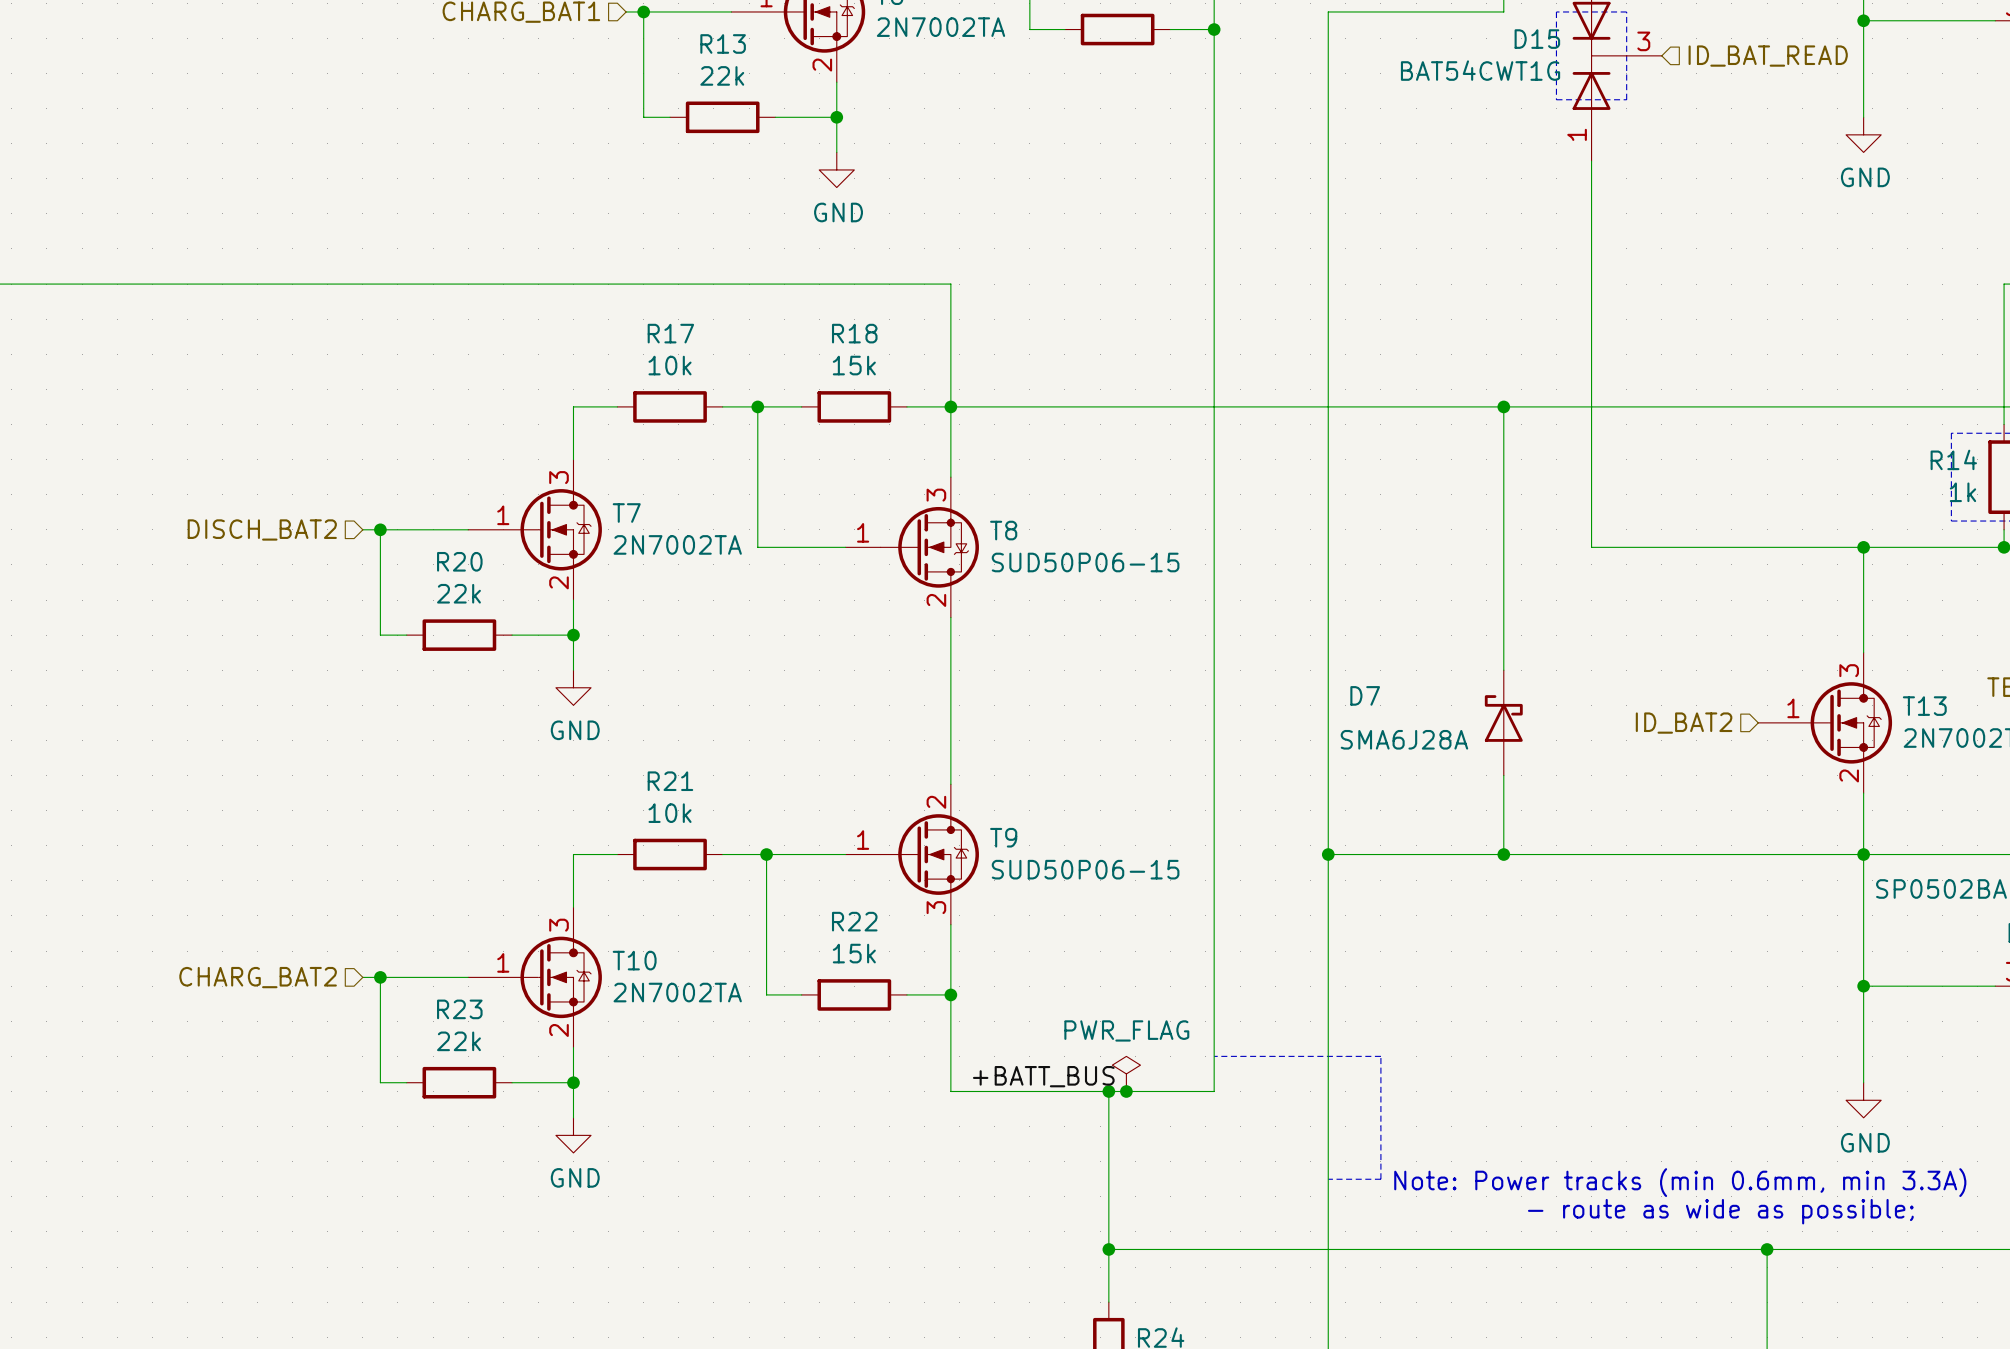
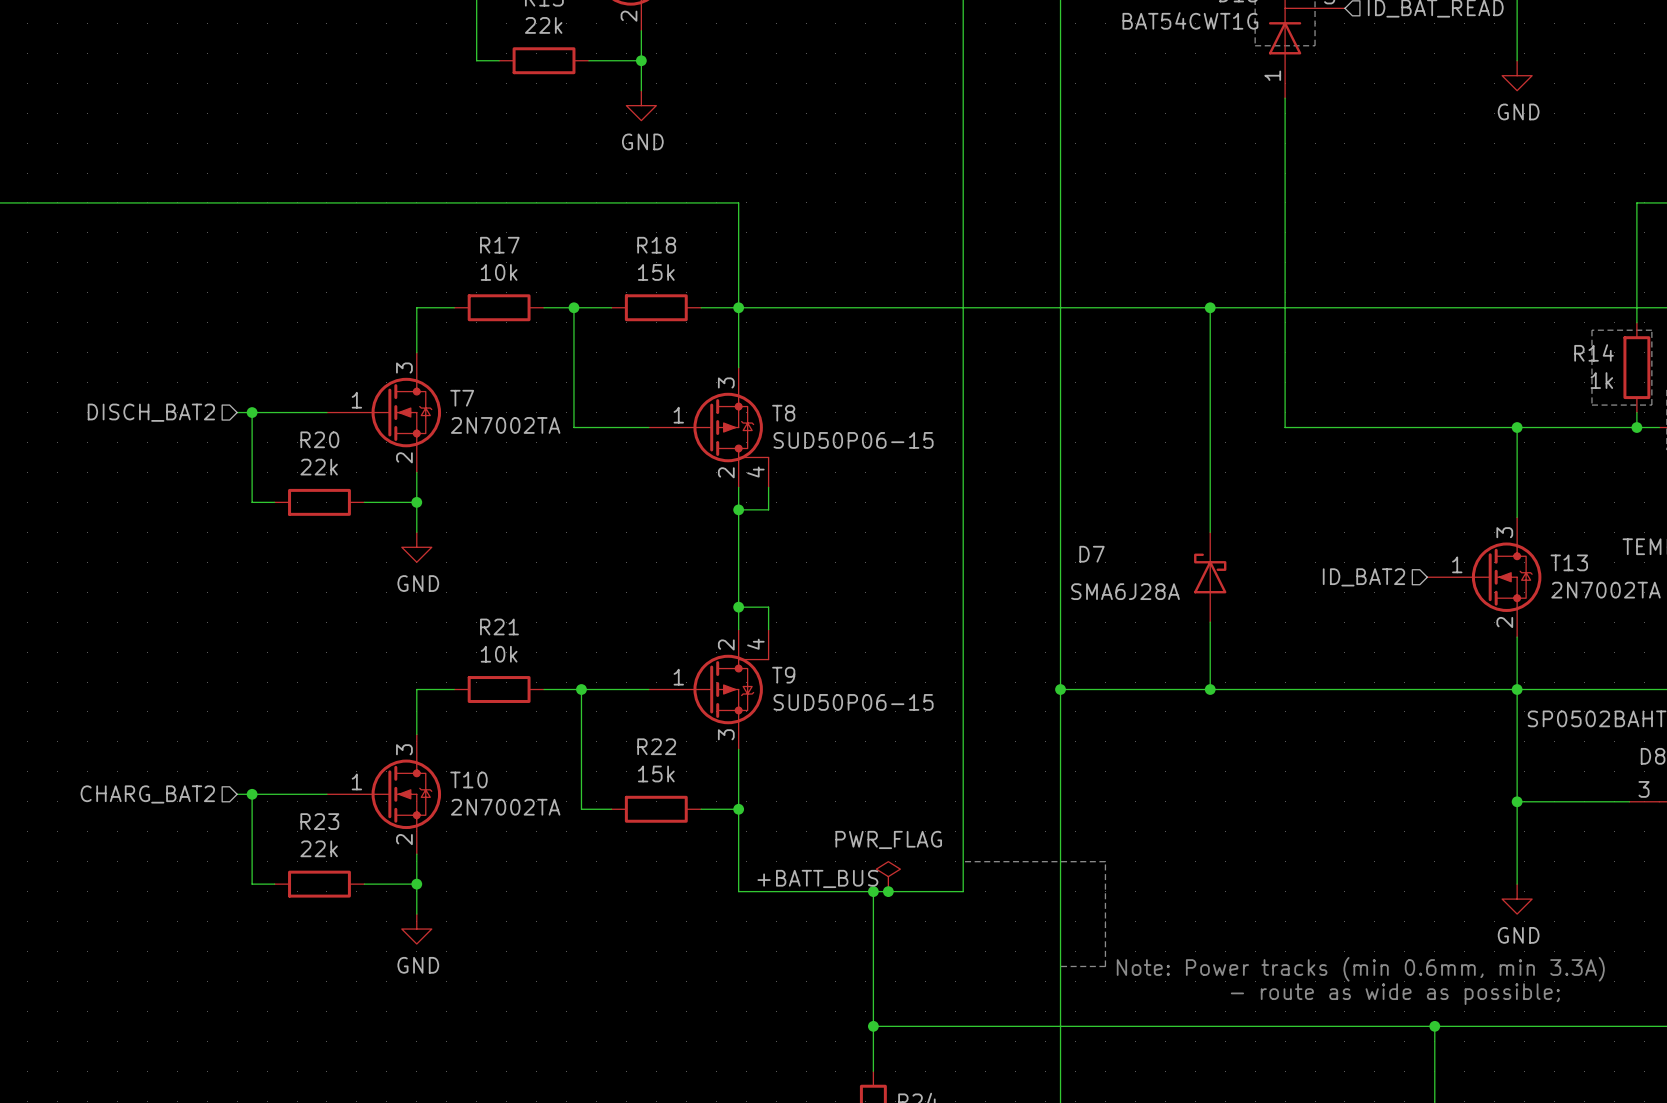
T8 symbol: [845, 477, 979, 618] -> [648, 367, 769, 488]
wire: none -> (768, 487) (768, 509) (738, 509)
junction: none -> (738, 509)
wire: none -> (738, 607) (768, 607) (768, 629)
junction: none -> (738, 607)
T9 symbol: [845, 784, 979, 925] -> [648, 629, 769, 750]

